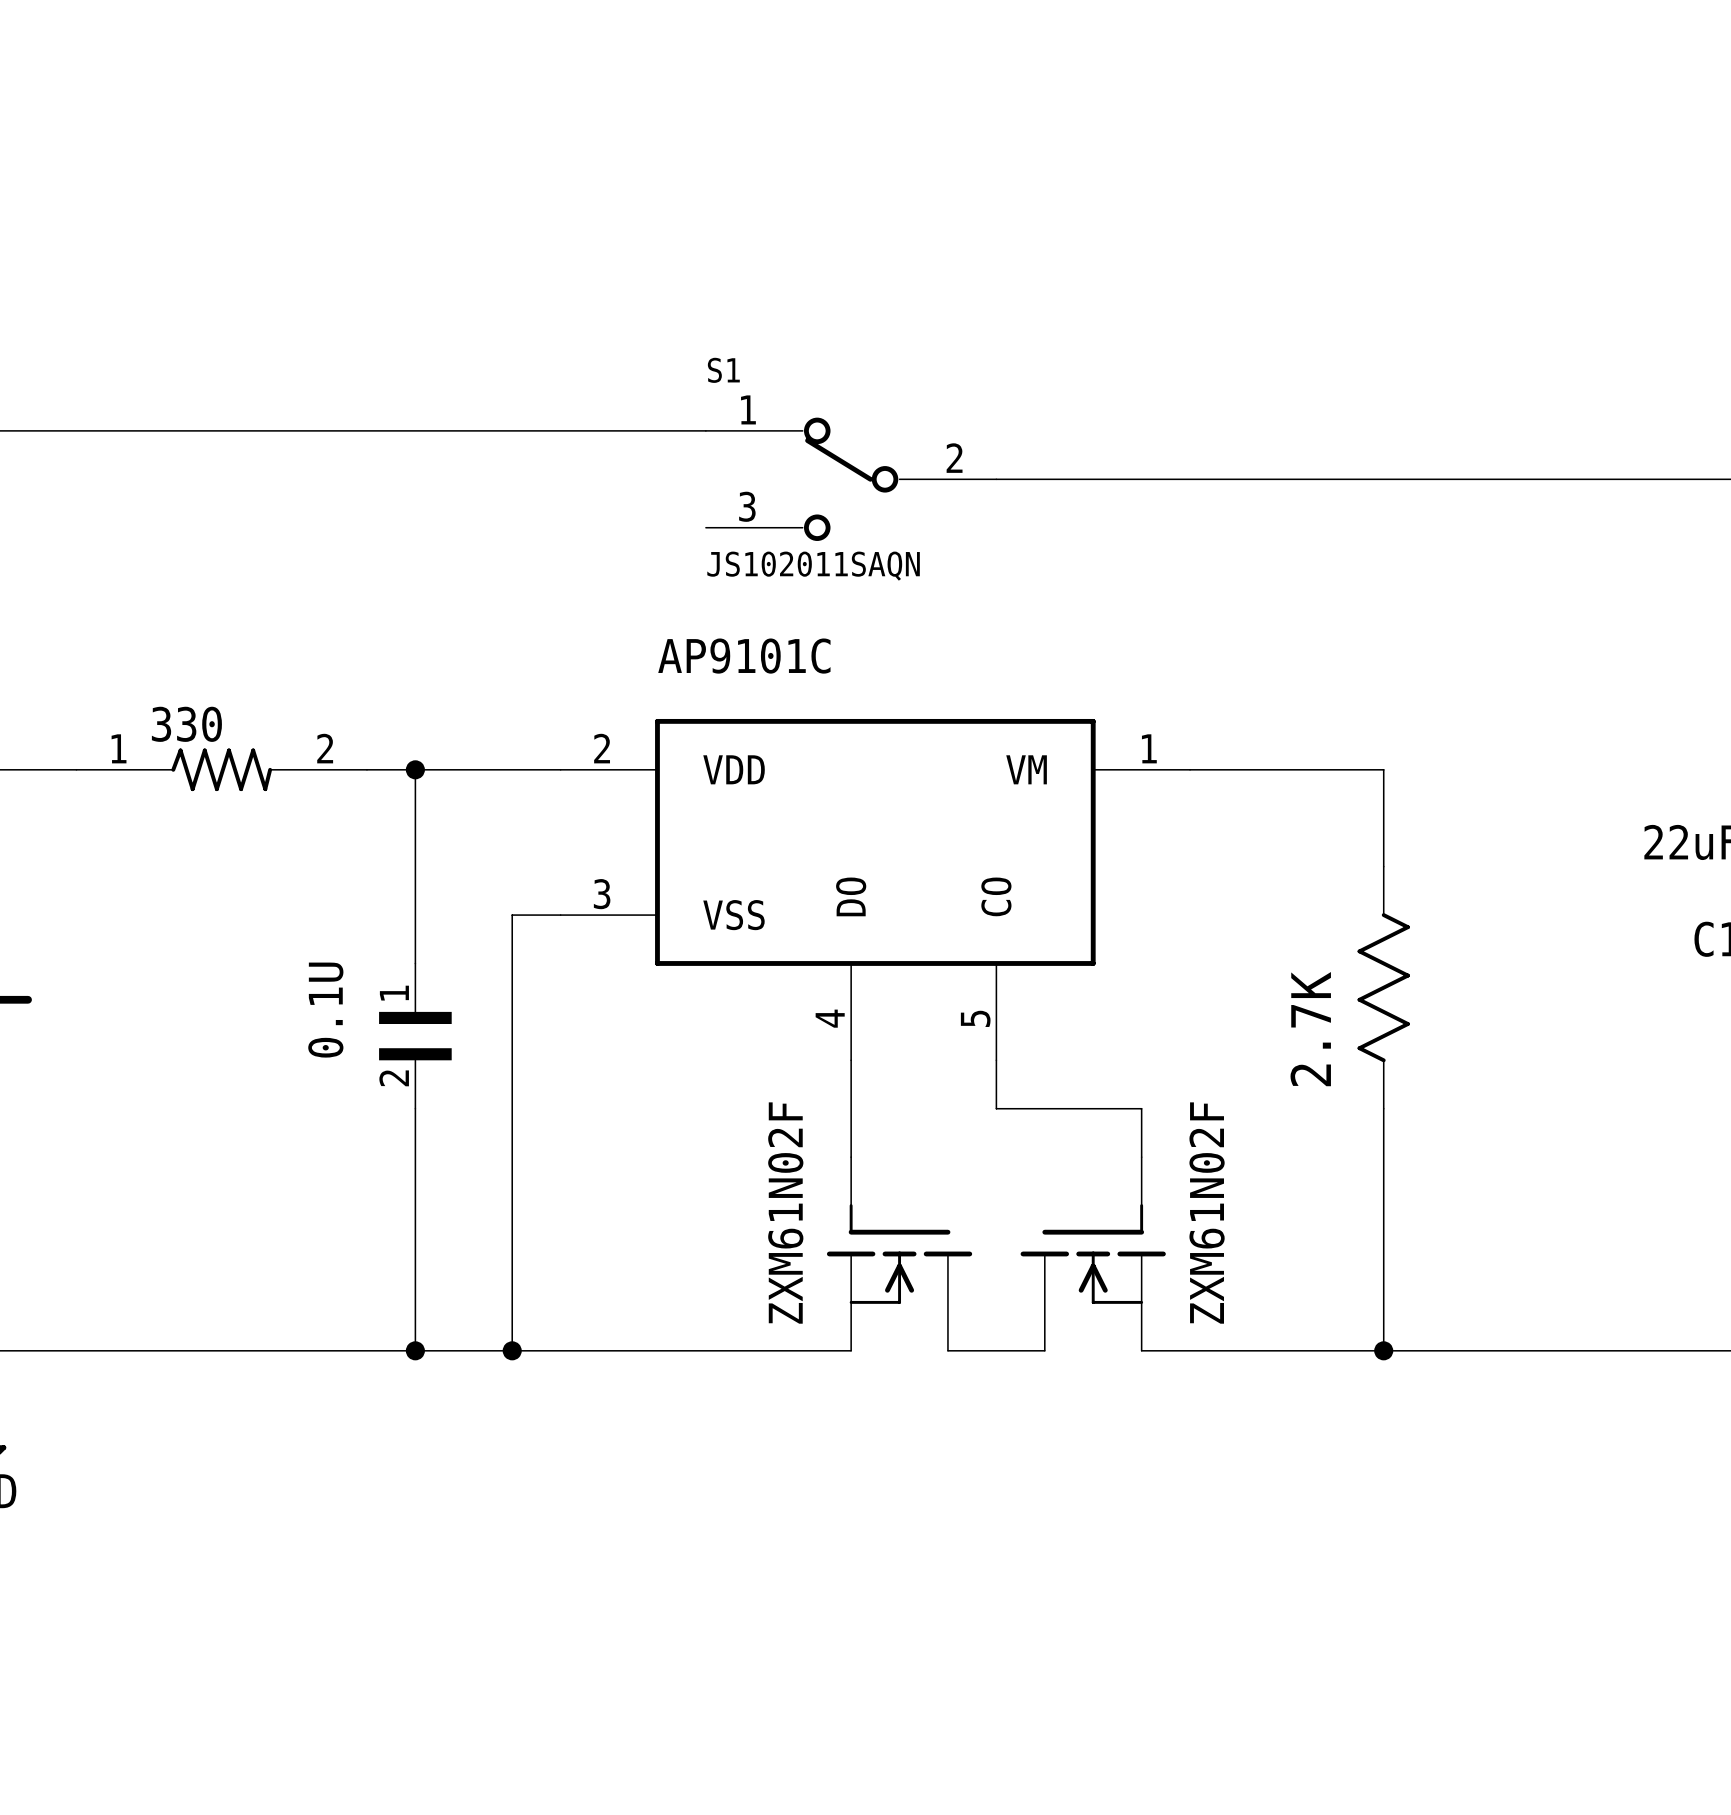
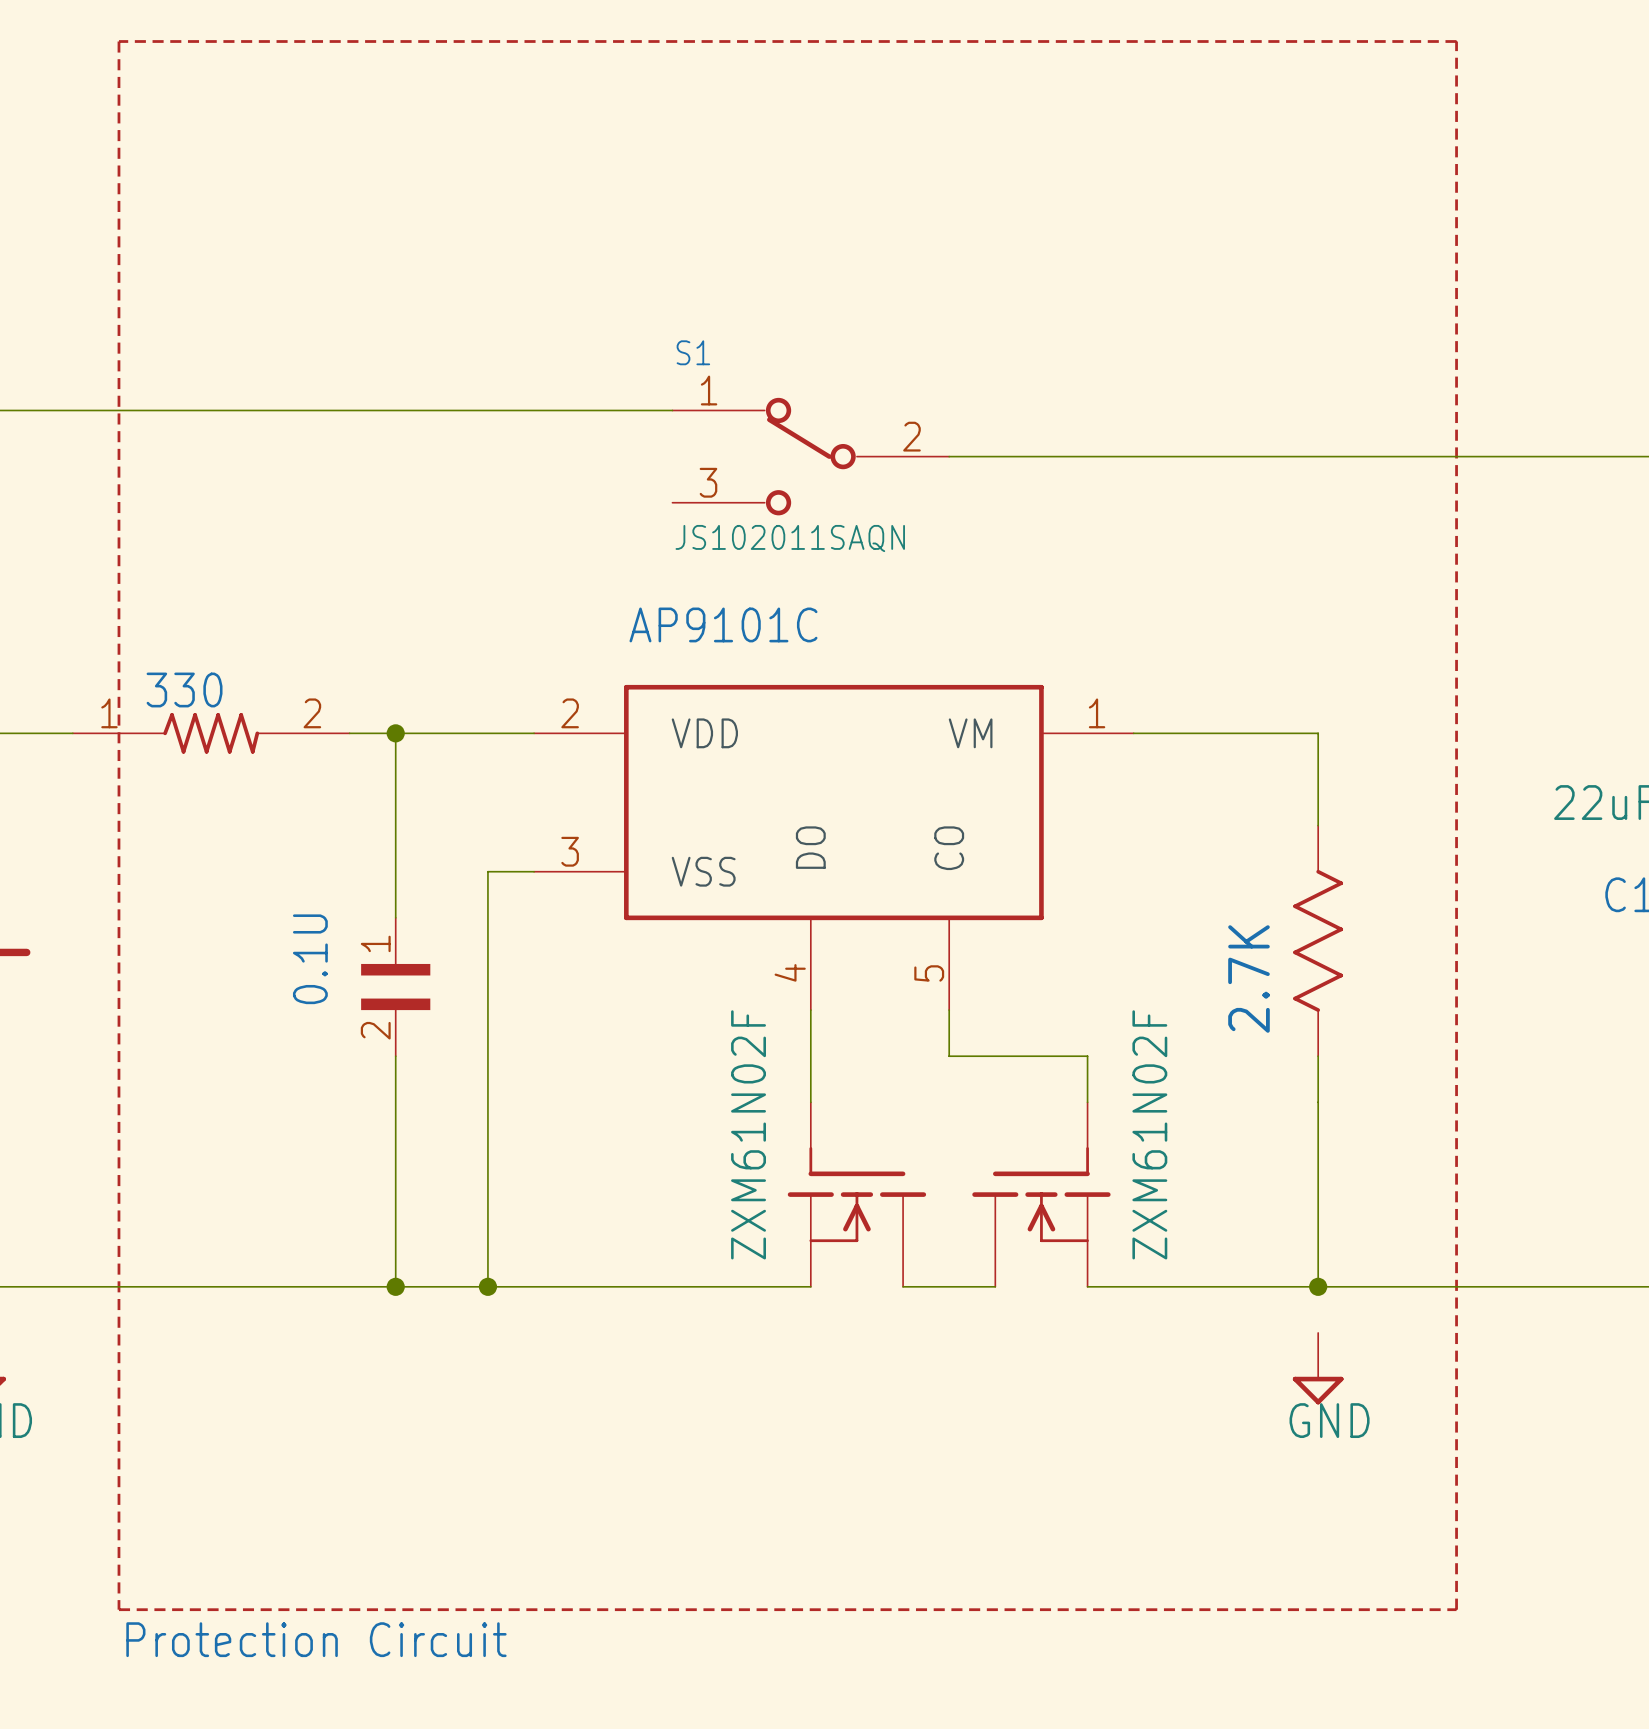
line: none -> (118, 41) (118, 1609) (1456, 1609) (1456, 41) (118, 41)
power symbol: none -> GND (1318, 1368)
text: none -> Protection Circuit (316, 1639)

